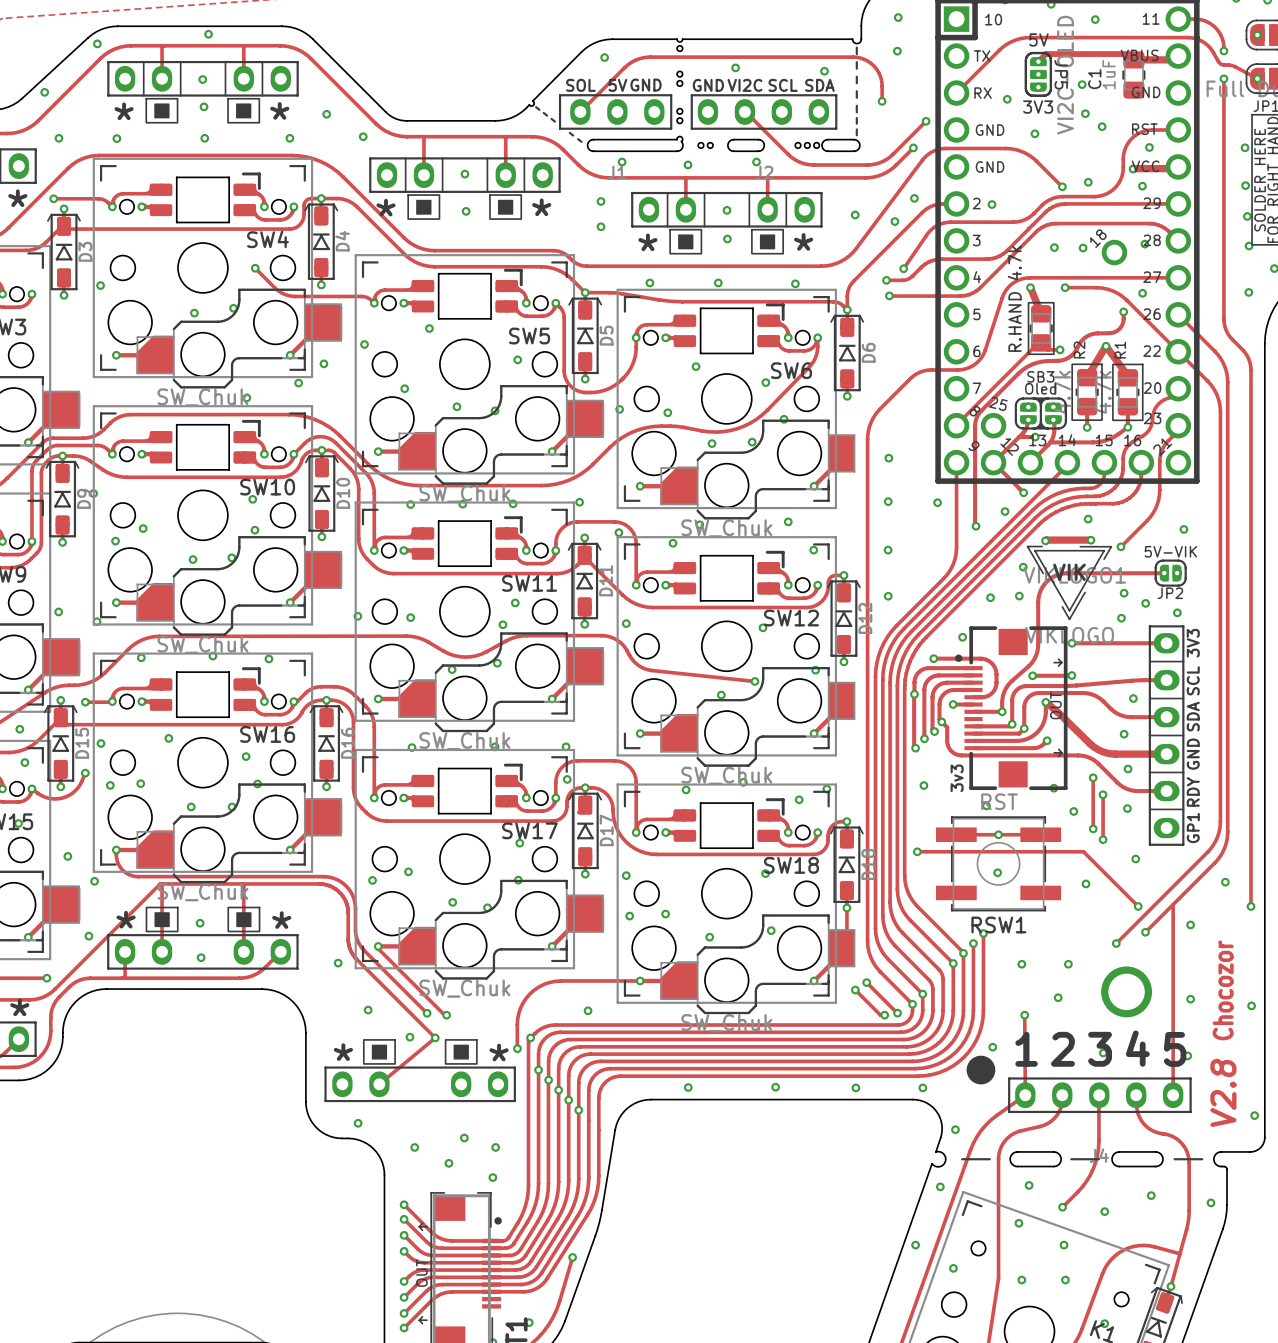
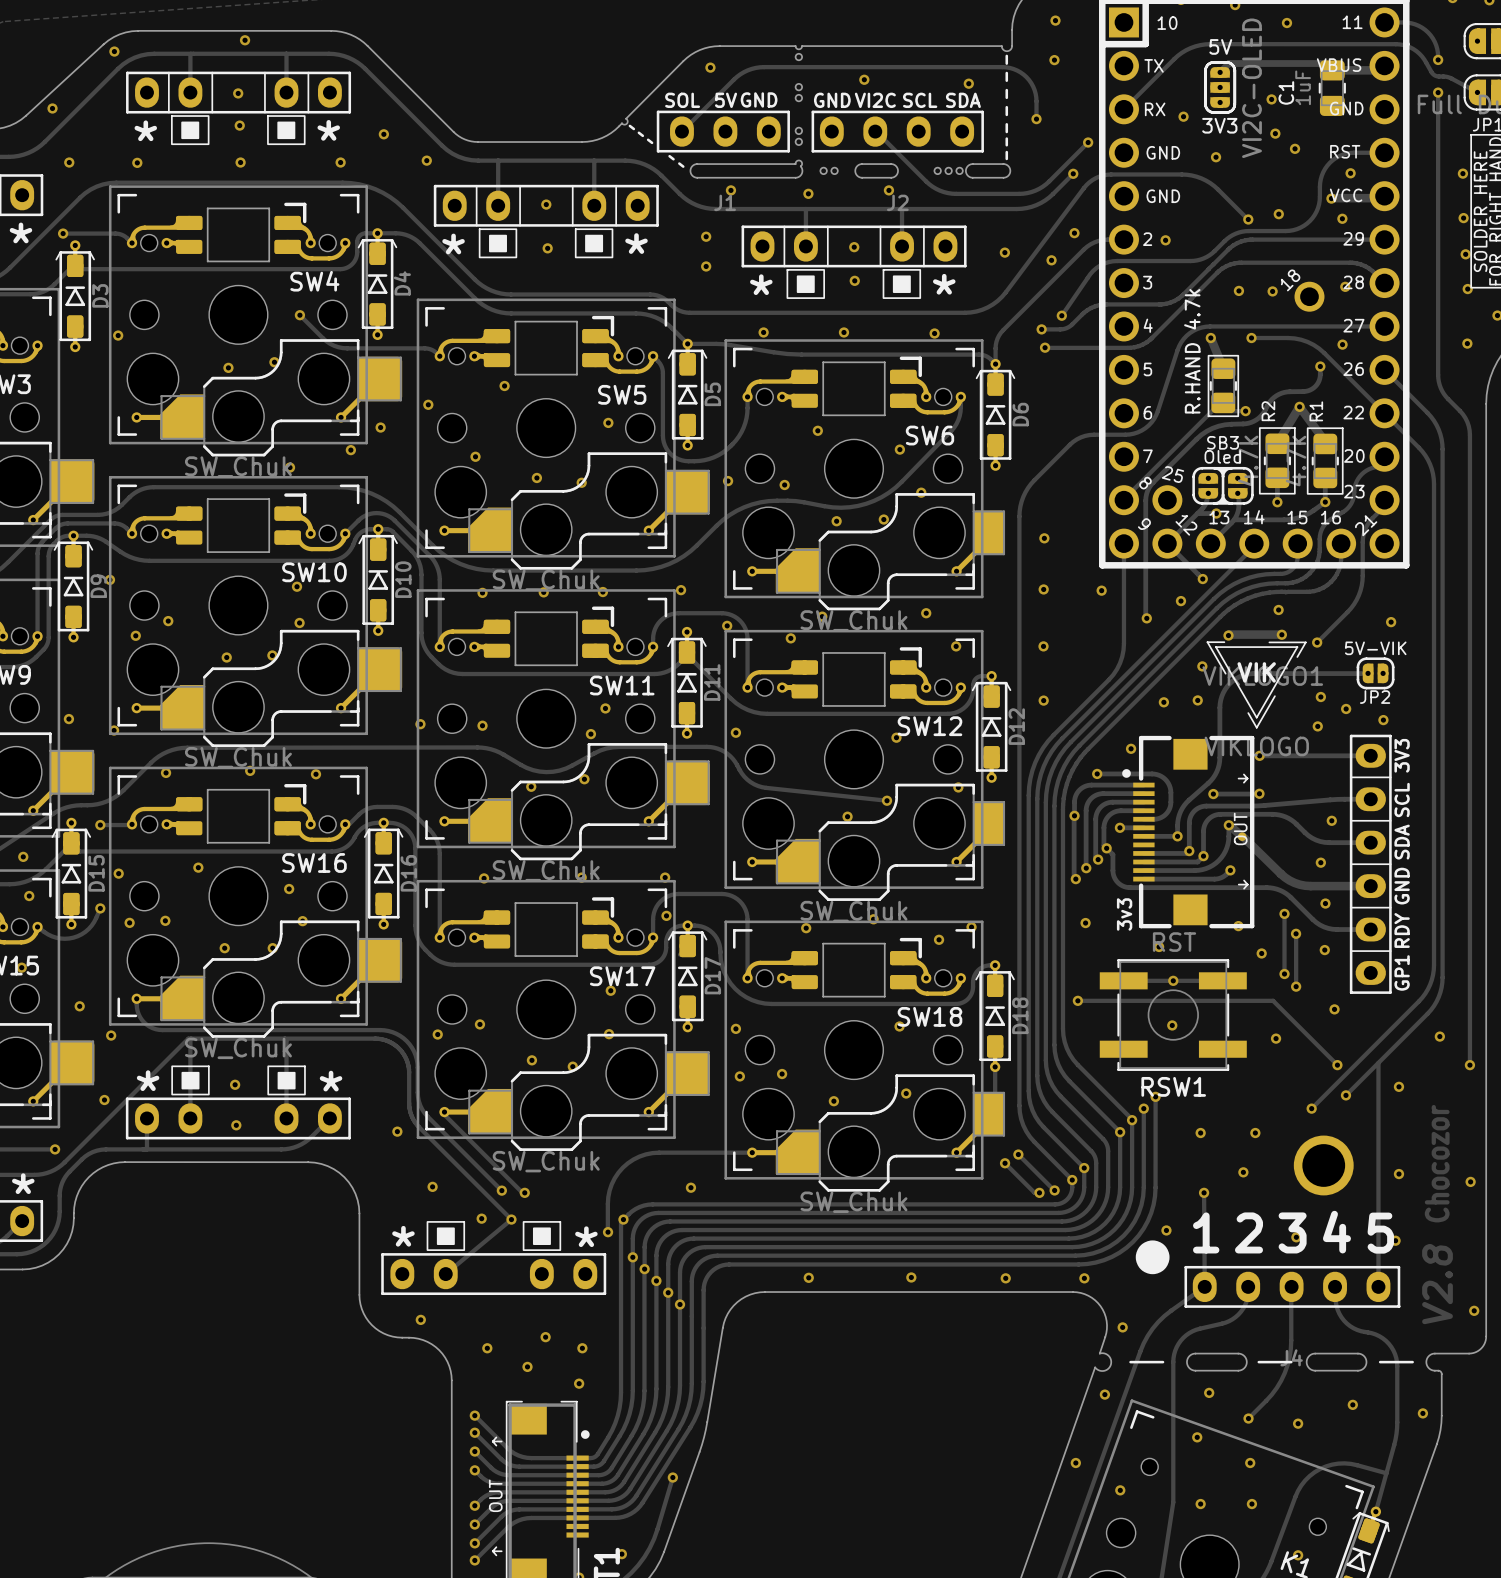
part text: JP5 (1061, 74) -> none

